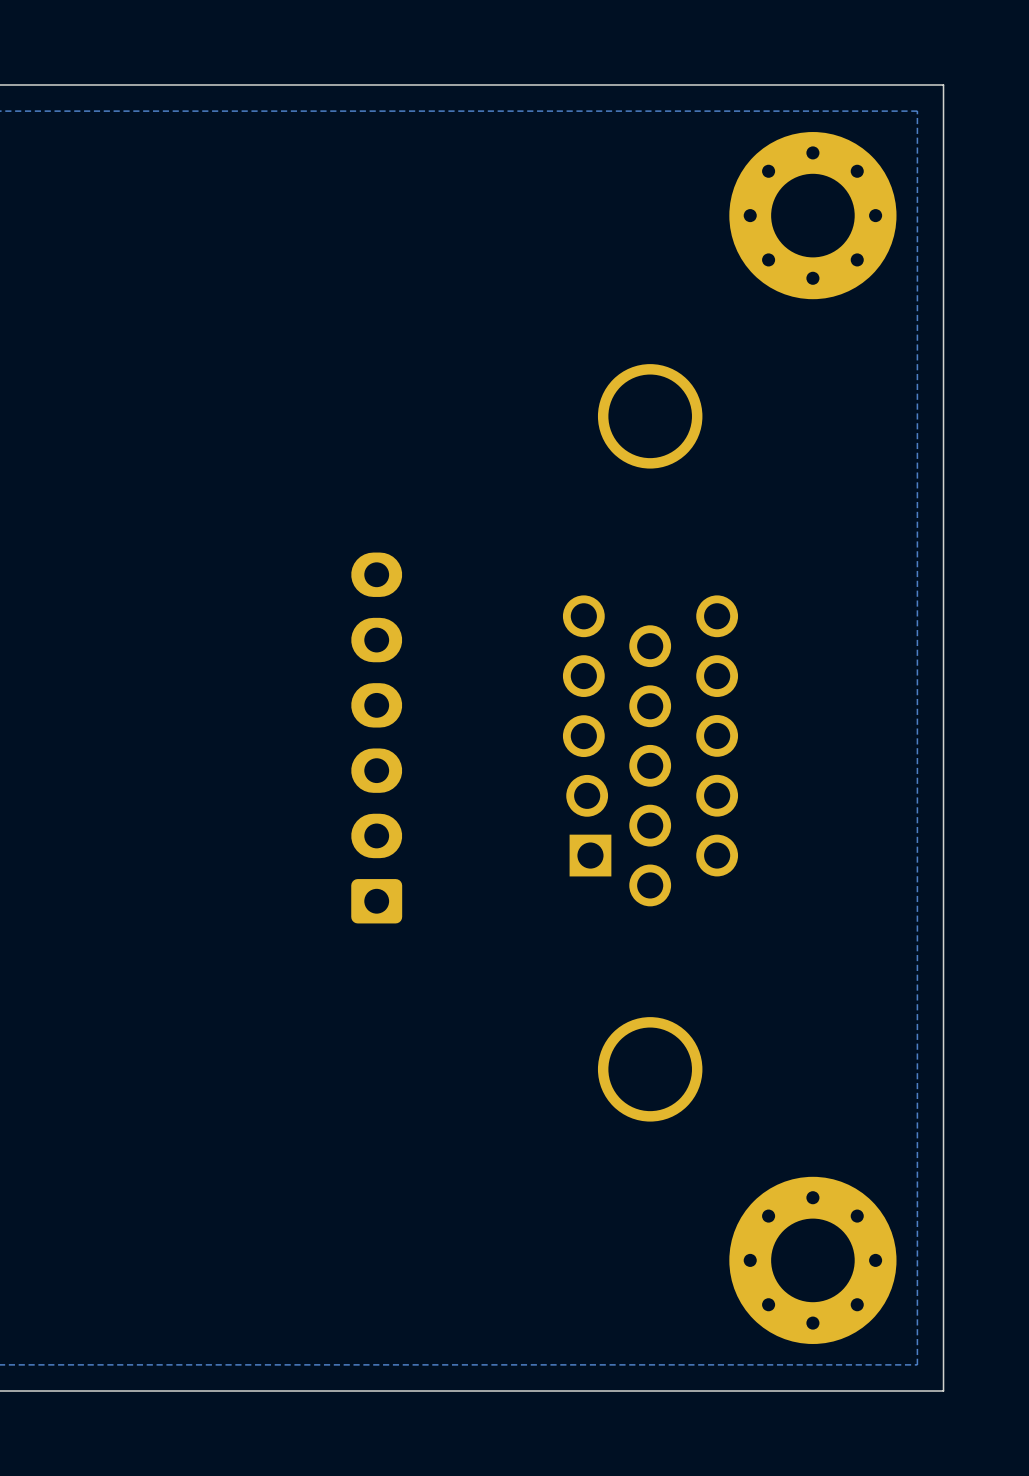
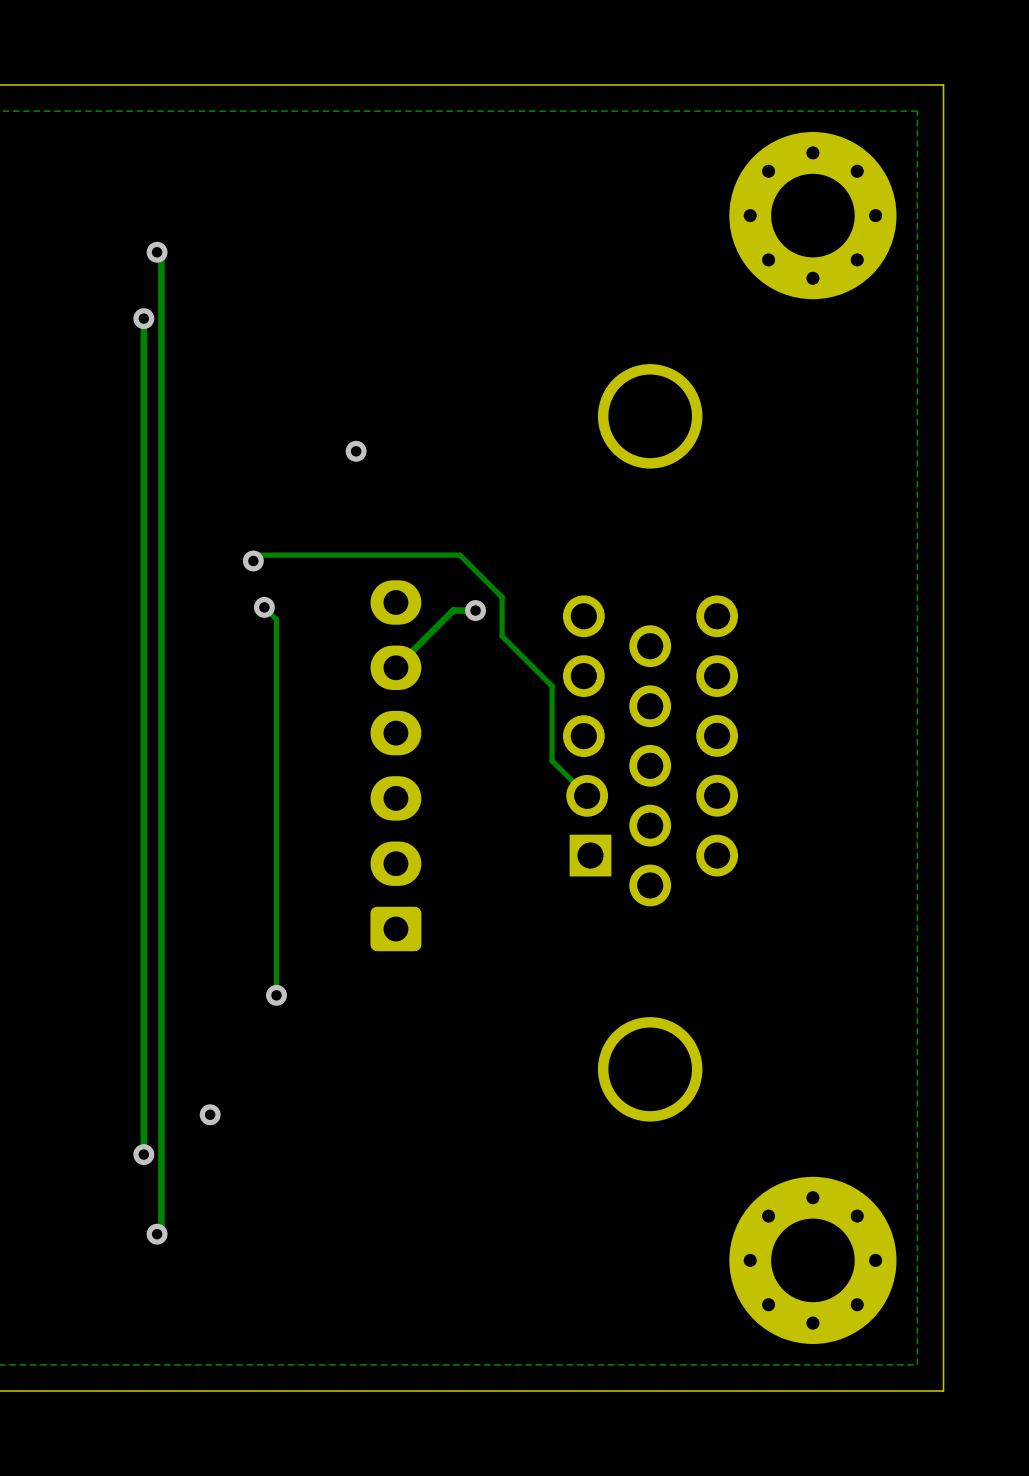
track: none -> (157, 252) (161, 256) (161, 1229) (157, 1234)
via: none -> (157, 252)
track: none -> (143, 318) (143, 1154)
via: none -> (143, 318)
via: none -> (356, 451)
track: none -> (253, 560) (259, 555) (459, 555) (502, 597) (502, 636) (552, 686) (552, 760) (587, 795)
via: none -> (253, 560)
track: none -> (264, 607) (276, 619) (276, 995)
via: none -> (264, 607)
track: none -> (475, 610) (453, 610) (395, 667)
via: none -> (475, 610)
part position: (376, 738) -> (395, 765)
via: none -> (276, 995)
via: none -> (210, 1114)
via: none -> (143, 1154)
via: none -> (157, 1234)

